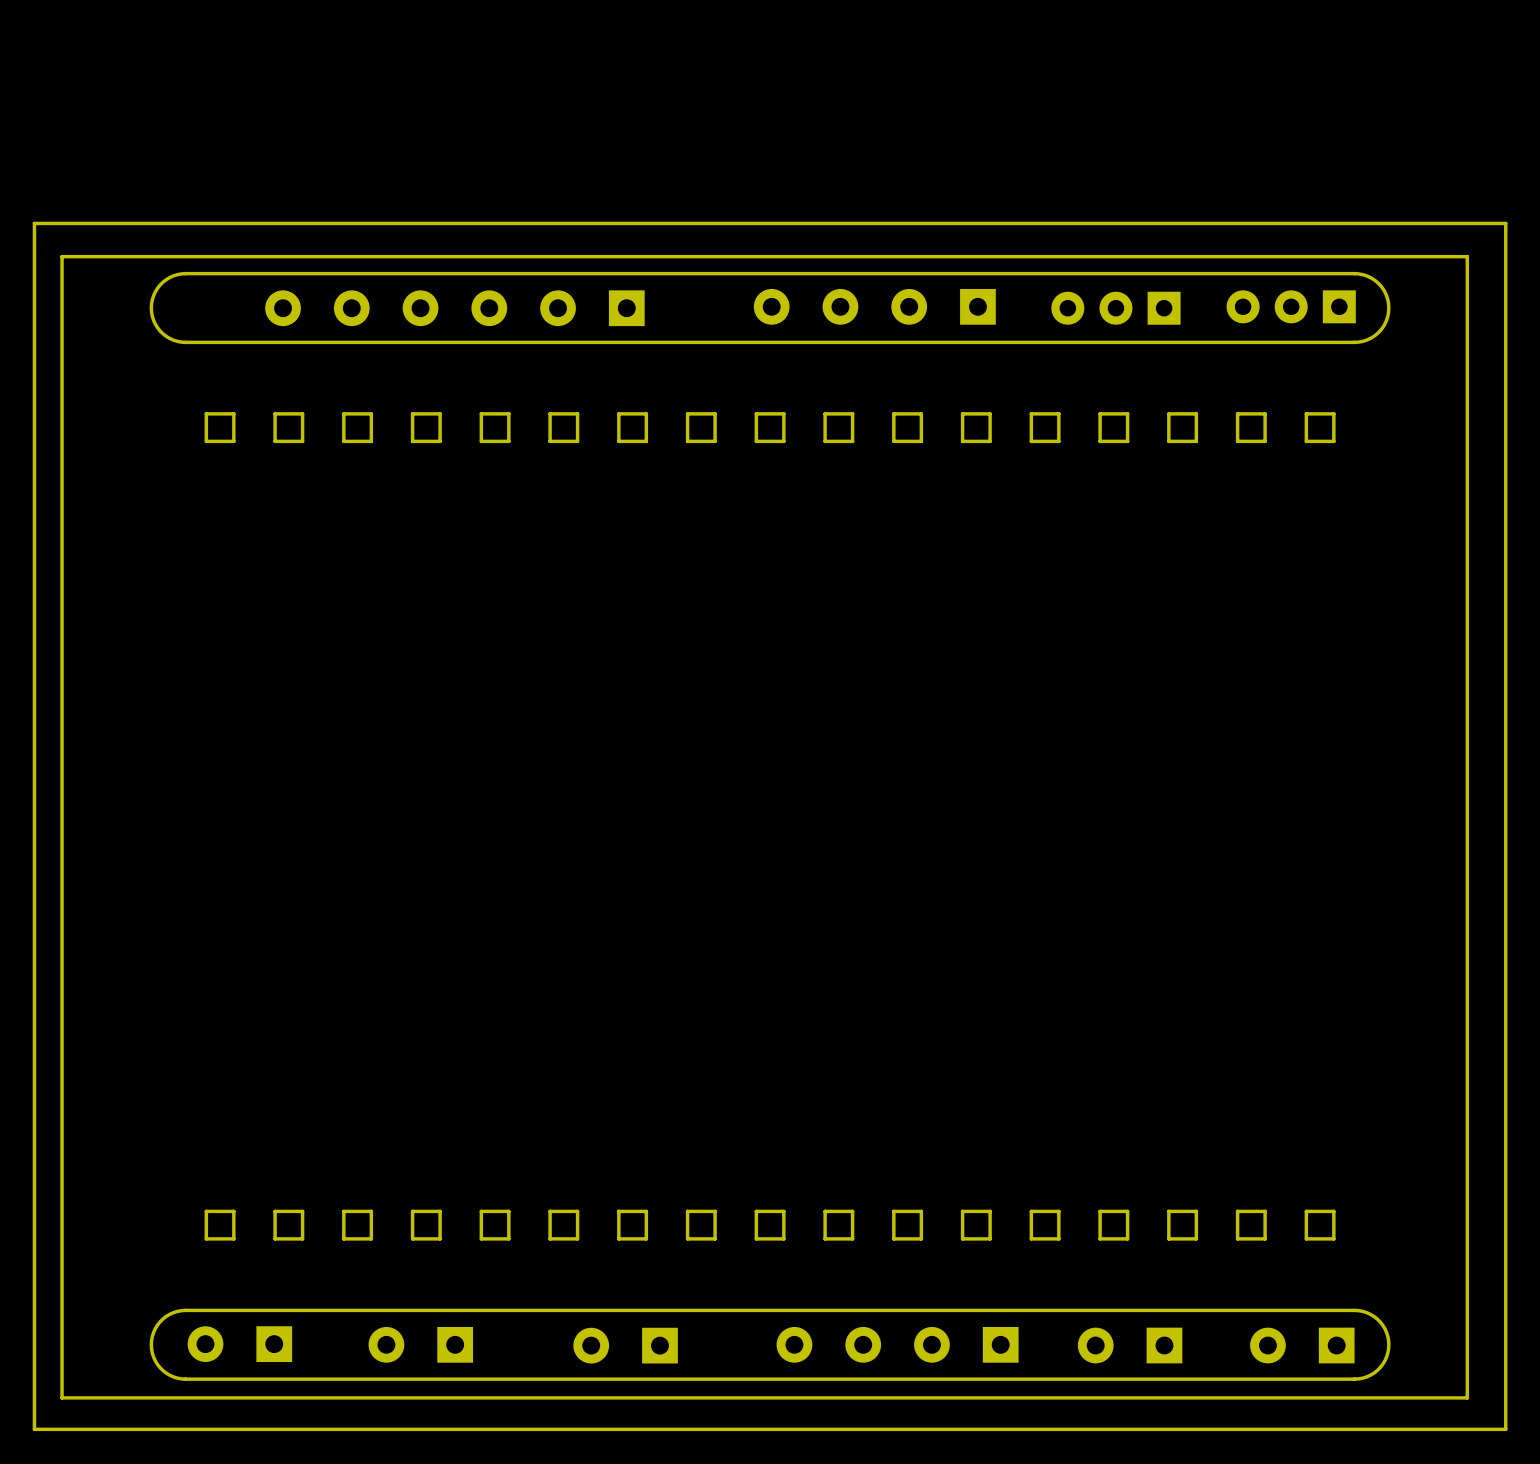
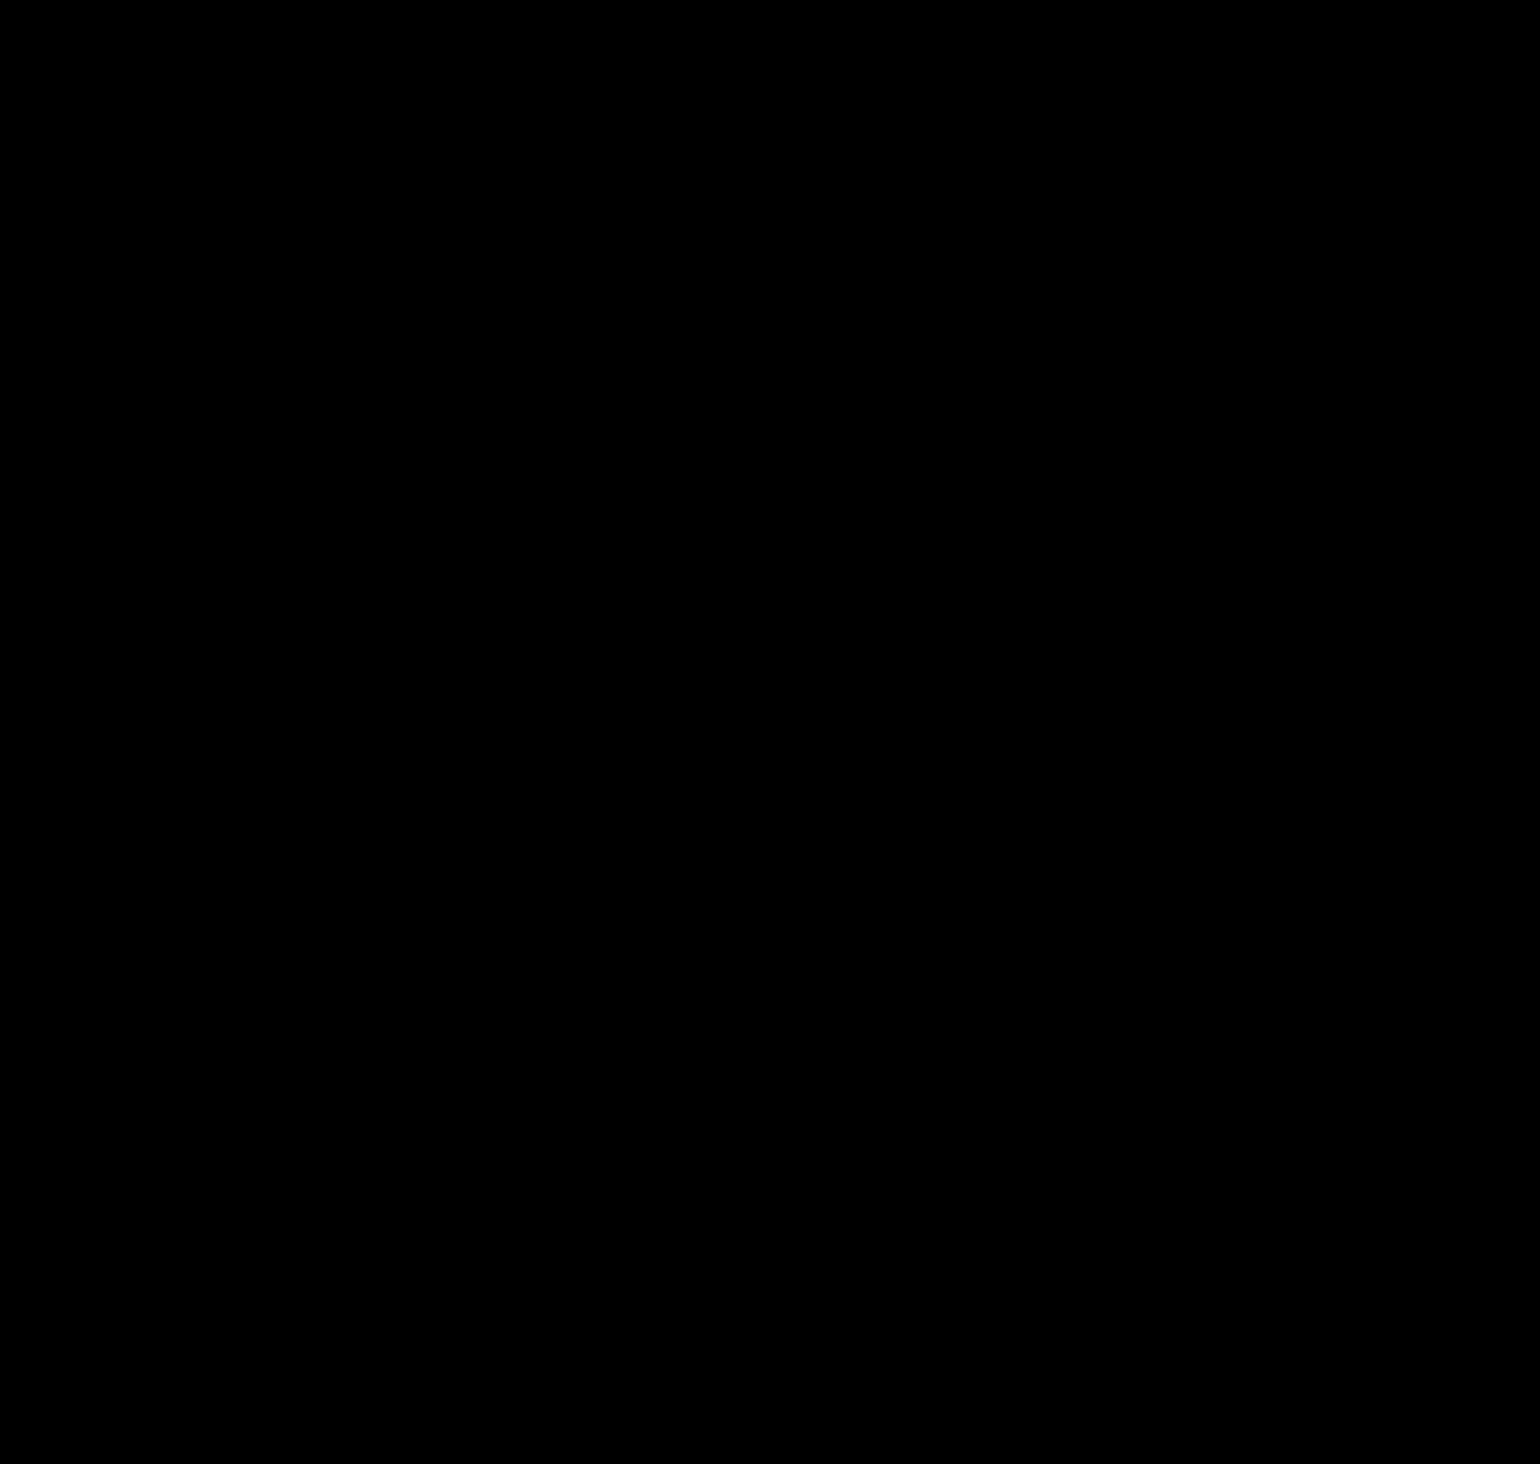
board edge: (1505, 223) (1505, 1429) (34, 1429) (34, 223) (1505, 223) -> none
board edge: (1467, 256) (1467, 1397) (62, 1397) (62, 256) (1467, 256) -> none
board edge: (1354, 273) (185, 273) (173, 275) (162, 282) (153, 295) (151, 308) (153, 320) (162, 333) (173, 340) (185, 342) (1354, 342) (1367, 339) (1378, 332) (1386, 321) (1388, 308) (1386, 294) (1378, 283) (1367, 276) (1354, 273) -> none
part: (874, 306) -> none
part: (1291, 306) -> none
part: (454, 308) -> none
part: (1115, 308) -> none
board edge: (233, 413) (206, 413) (206, 441) (233, 441) (233, 413) -> none
board edge: (302, 413) (275, 413) (275, 441) (302, 441) (302, 413) -> none
board edge: (371, 413) (343, 413) (343, 441) (371, 441) (371, 413) -> none
board edge: (440, 413) (412, 413) (412, 441) (440, 441) (440, 413) -> none
board edge: (508, 413) (481, 413) (481, 441) (508, 441) (508, 413) -> none
board edge: (577, 413) (550, 413) (550, 441) (577, 441) (577, 413) -> none
board edge: (646, 413) (618, 413) (618, 441) (646, 441) (646, 413) -> none
board edge: (715, 413) (687, 413) (687, 441) (715, 441) (715, 413) -> none
board edge: (783, 413) (756, 413) (756, 441) (783, 441) (783, 413) -> none
board edge: (852, 413) (825, 413) (825, 441) (852, 441) (852, 413) -> none
board edge: (921, 413) (893, 413) (893, 441) (921, 441) (921, 413) -> none
board edge: (990, 413) (962, 413) (962, 441) (990, 441) (990, 413) -> none
board edge: (1058, 413) (1031, 413) (1031, 441) (1058, 441) (1058, 413) -> none
board edge: (1127, 413) (1100, 413) (1100, 441) (1127, 441) (1127, 413) -> none
board edge: (1196, 413) (1168, 413) (1168, 441) (1196, 441) (1196, 413) -> none
board edge: (1265, 413) (1237, 413) (1237, 441) (1265, 441) (1265, 413) -> none
board edge: (1333, 413) (1306, 413) (1306, 441) (1333, 441) (1333, 413) -> none
board edge: (233, 1211) (206, 1211) (206, 1238) (233, 1238) (233, 1211) -> none
board edge: (302, 1211) (275, 1211) (275, 1238) (302, 1238) (302, 1211) -> none
board edge: (371, 1211) (343, 1211) (343, 1238) (371, 1238) (371, 1211) -> none
board edge: (440, 1211) (412, 1211) (412, 1238) (440, 1238) (440, 1211) -> none
board edge: (508, 1211) (481, 1211) (481, 1238) (508, 1238) (508, 1211) -> none
board edge: (577, 1211) (550, 1211) (550, 1238) (577, 1238) (577, 1211) -> none
board edge: (646, 1211) (618, 1211) (618, 1238) (646, 1238) (646, 1211) -> none
board edge: (715, 1211) (687, 1211) (687, 1238) (715, 1238) (715, 1211) -> none
board edge: (783, 1211) (756, 1211) (756, 1238) (783, 1238) (783, 1211) -> none
board edge: (852, 1211) (825, 1211) (825, 1238) (852, 1238) (852, 1211) -> none
board edge: (921, 1211) (893, 1211) (893, 1238) (921, 1238) (921, 1211) -> none
board edge: (990, 1211) (962, 1211) (962, 1238) (990, 1238) (990, 1211) -> none
board edge: (1058, 1211) (1058, 1238) (1031, 1238) (1031, 1211) (1058, 1211) -> none
board edge: (1127, 1211) (1100, 1211) (1100, 1238) (1127, 1238) (1127, 1211) -> none
board edge: (1196, 1211) (1168, 1211) (1168, 1238) (1196, 1238) (1196, 1211) -> none
board edge: (1265, 1211) (1237, 1211) (1237, 1238) (1265, 1238) (1265, 1211) -> none
board edge: (1333, 1211) (1306, 1211) (1306, 1238) (1333, 1238) (1333, 1211) -> none
board edge: (1354, 1310) (185, 1310) (173, 1312) (159, 1321) (153, 1332) (151, 1344) (153, 1356) (162, 1370) (173, 1376) (185, 1379) (1354, 1379) (1366, 1376) (1377, 1370) (1386, 1356) (1388, 1344) (1386, 1332) (1377, 1319) (1366, 1312) (1354, 1310) -> none
part: (239, 1344) -> none
part: (420, 1344) -> none
part: (897, 1344) -> none
part: (625, 1345) -> none
part: (1130, 1345) -> none
part: (1302, 1345) -> none

